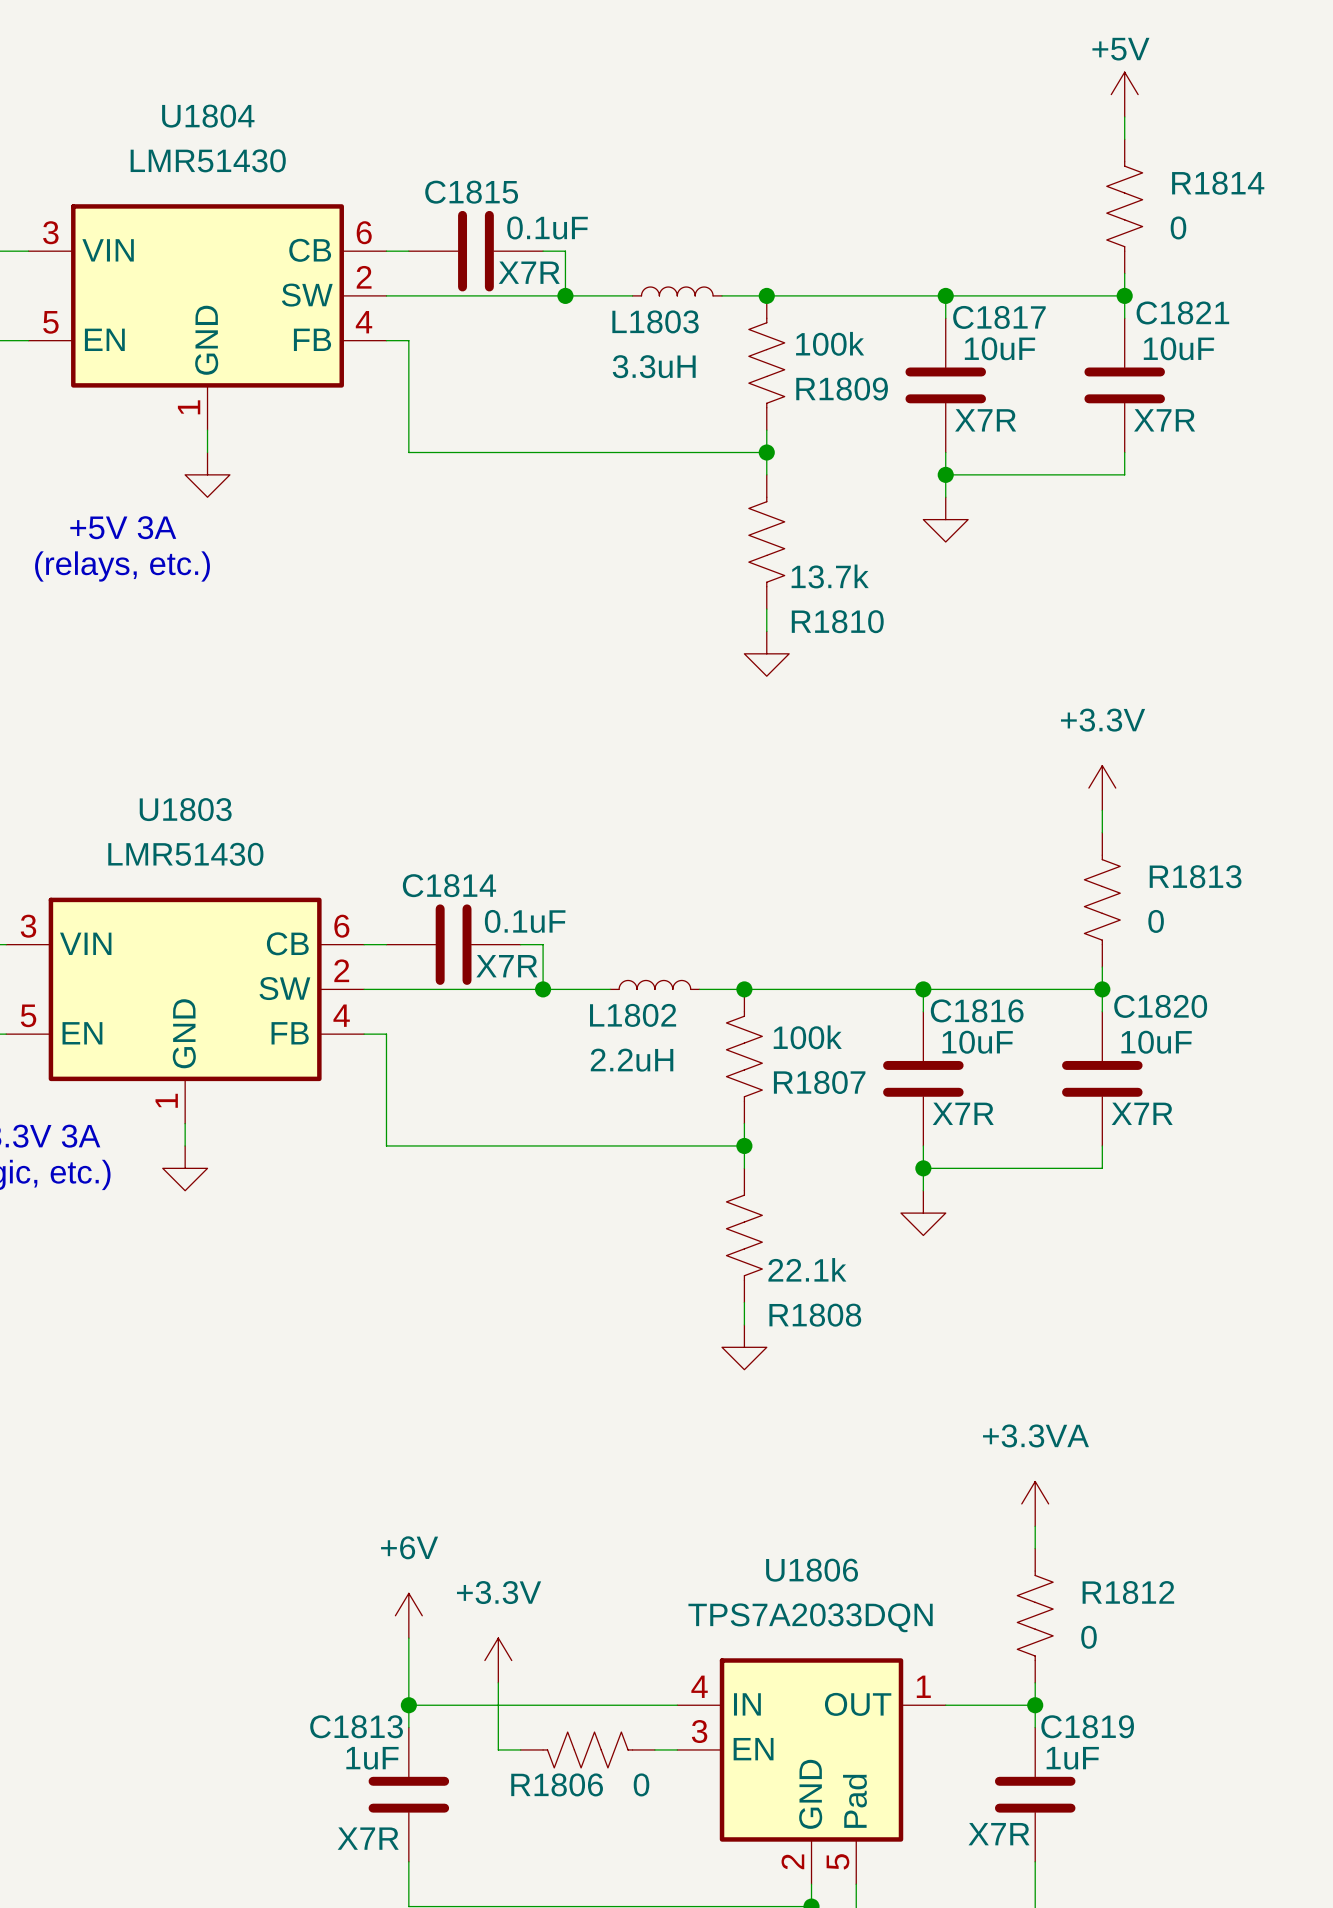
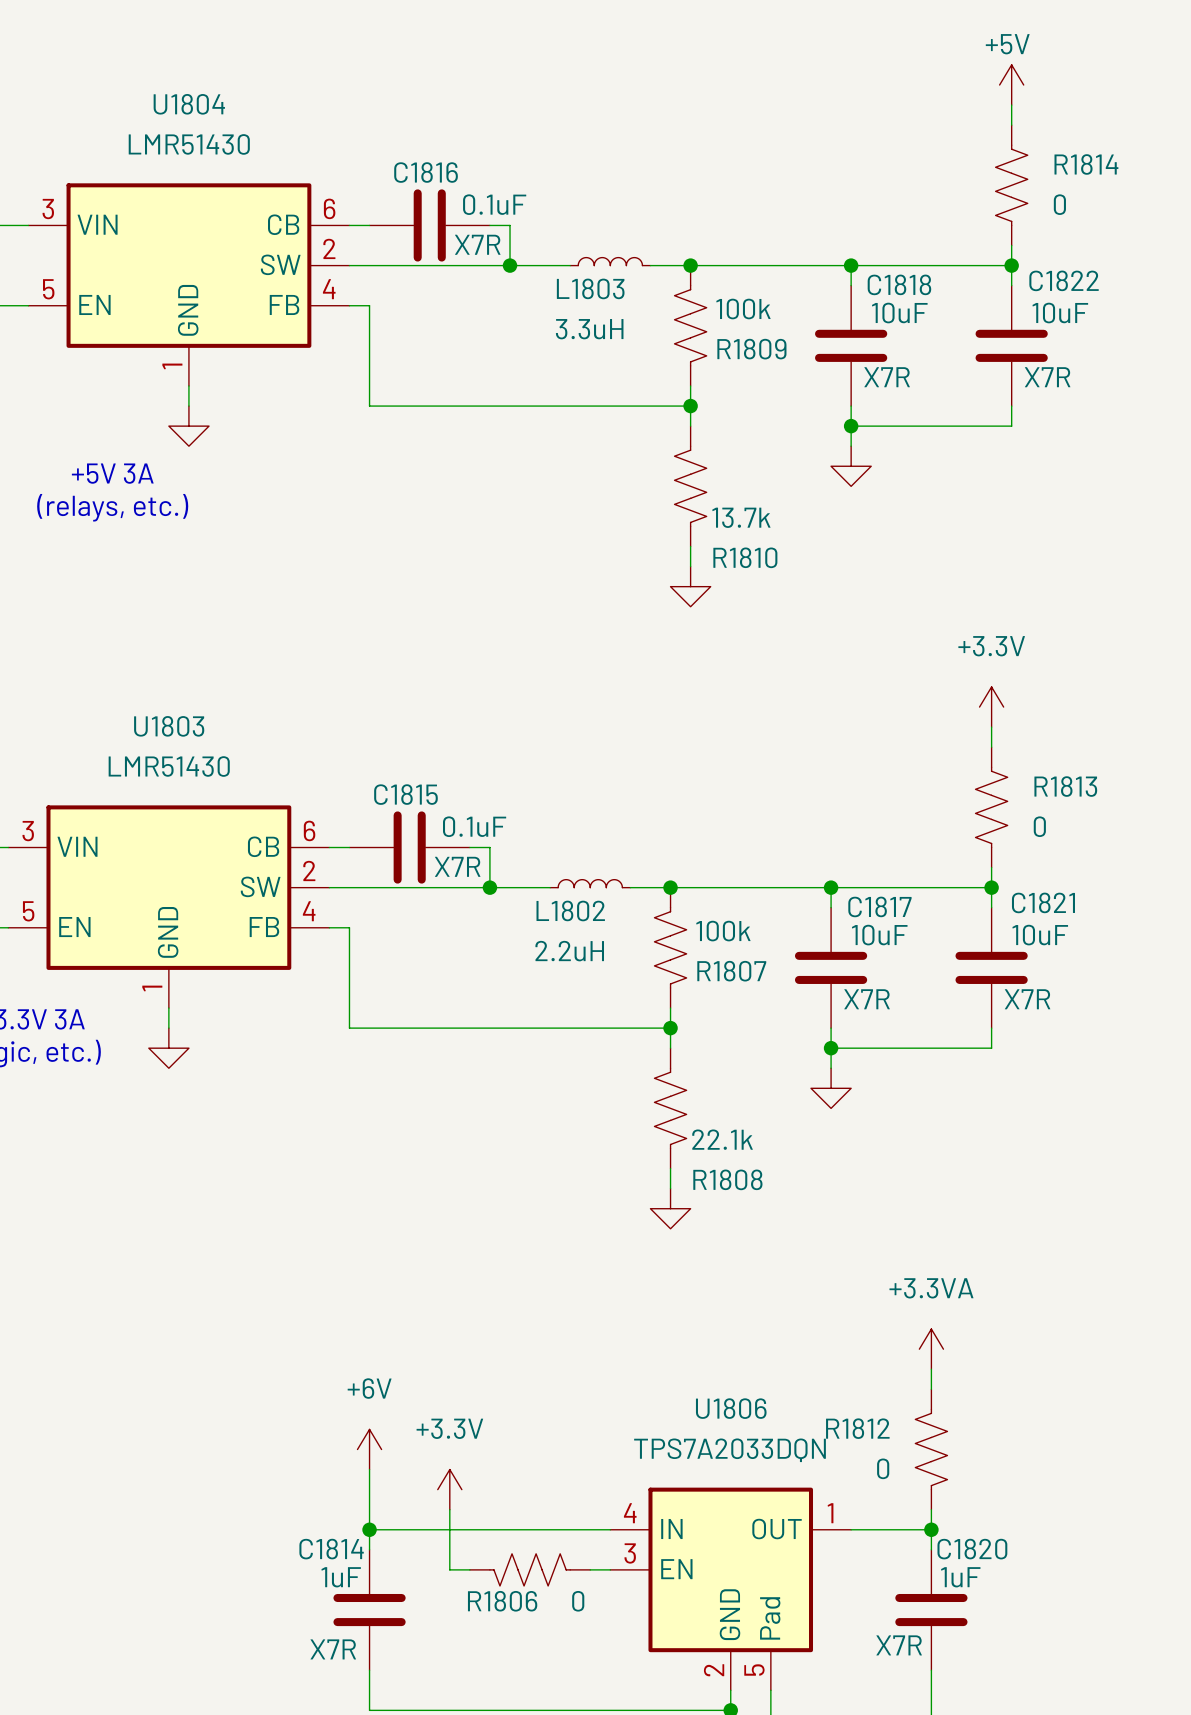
C1815 name: C1815 (471, 192) -> C1816 (426, 172)
C1821 name: C1821 (1182, 312) -> C1822 (1064, 280)
C1817 name: C1817 (999, 317) -> C1818 (899, 284)
C1814 name: C1814 (449, 885) -> C1815 (405, 794)
C1820 name: C1820 (1160, 1006) -> C1821 (1043, 902)
C1816 name: C1816 (977, 1010) -> C1817 (879, 906)
R1812 flip: as is (1035, 1615) -> left-right (931, 1449)
C1813 name: C1813 (356, 1726) -> C1814 (331, 1549)
C1819 name: C1819 (1087, 1726) -> C1820 (972, 1549)

